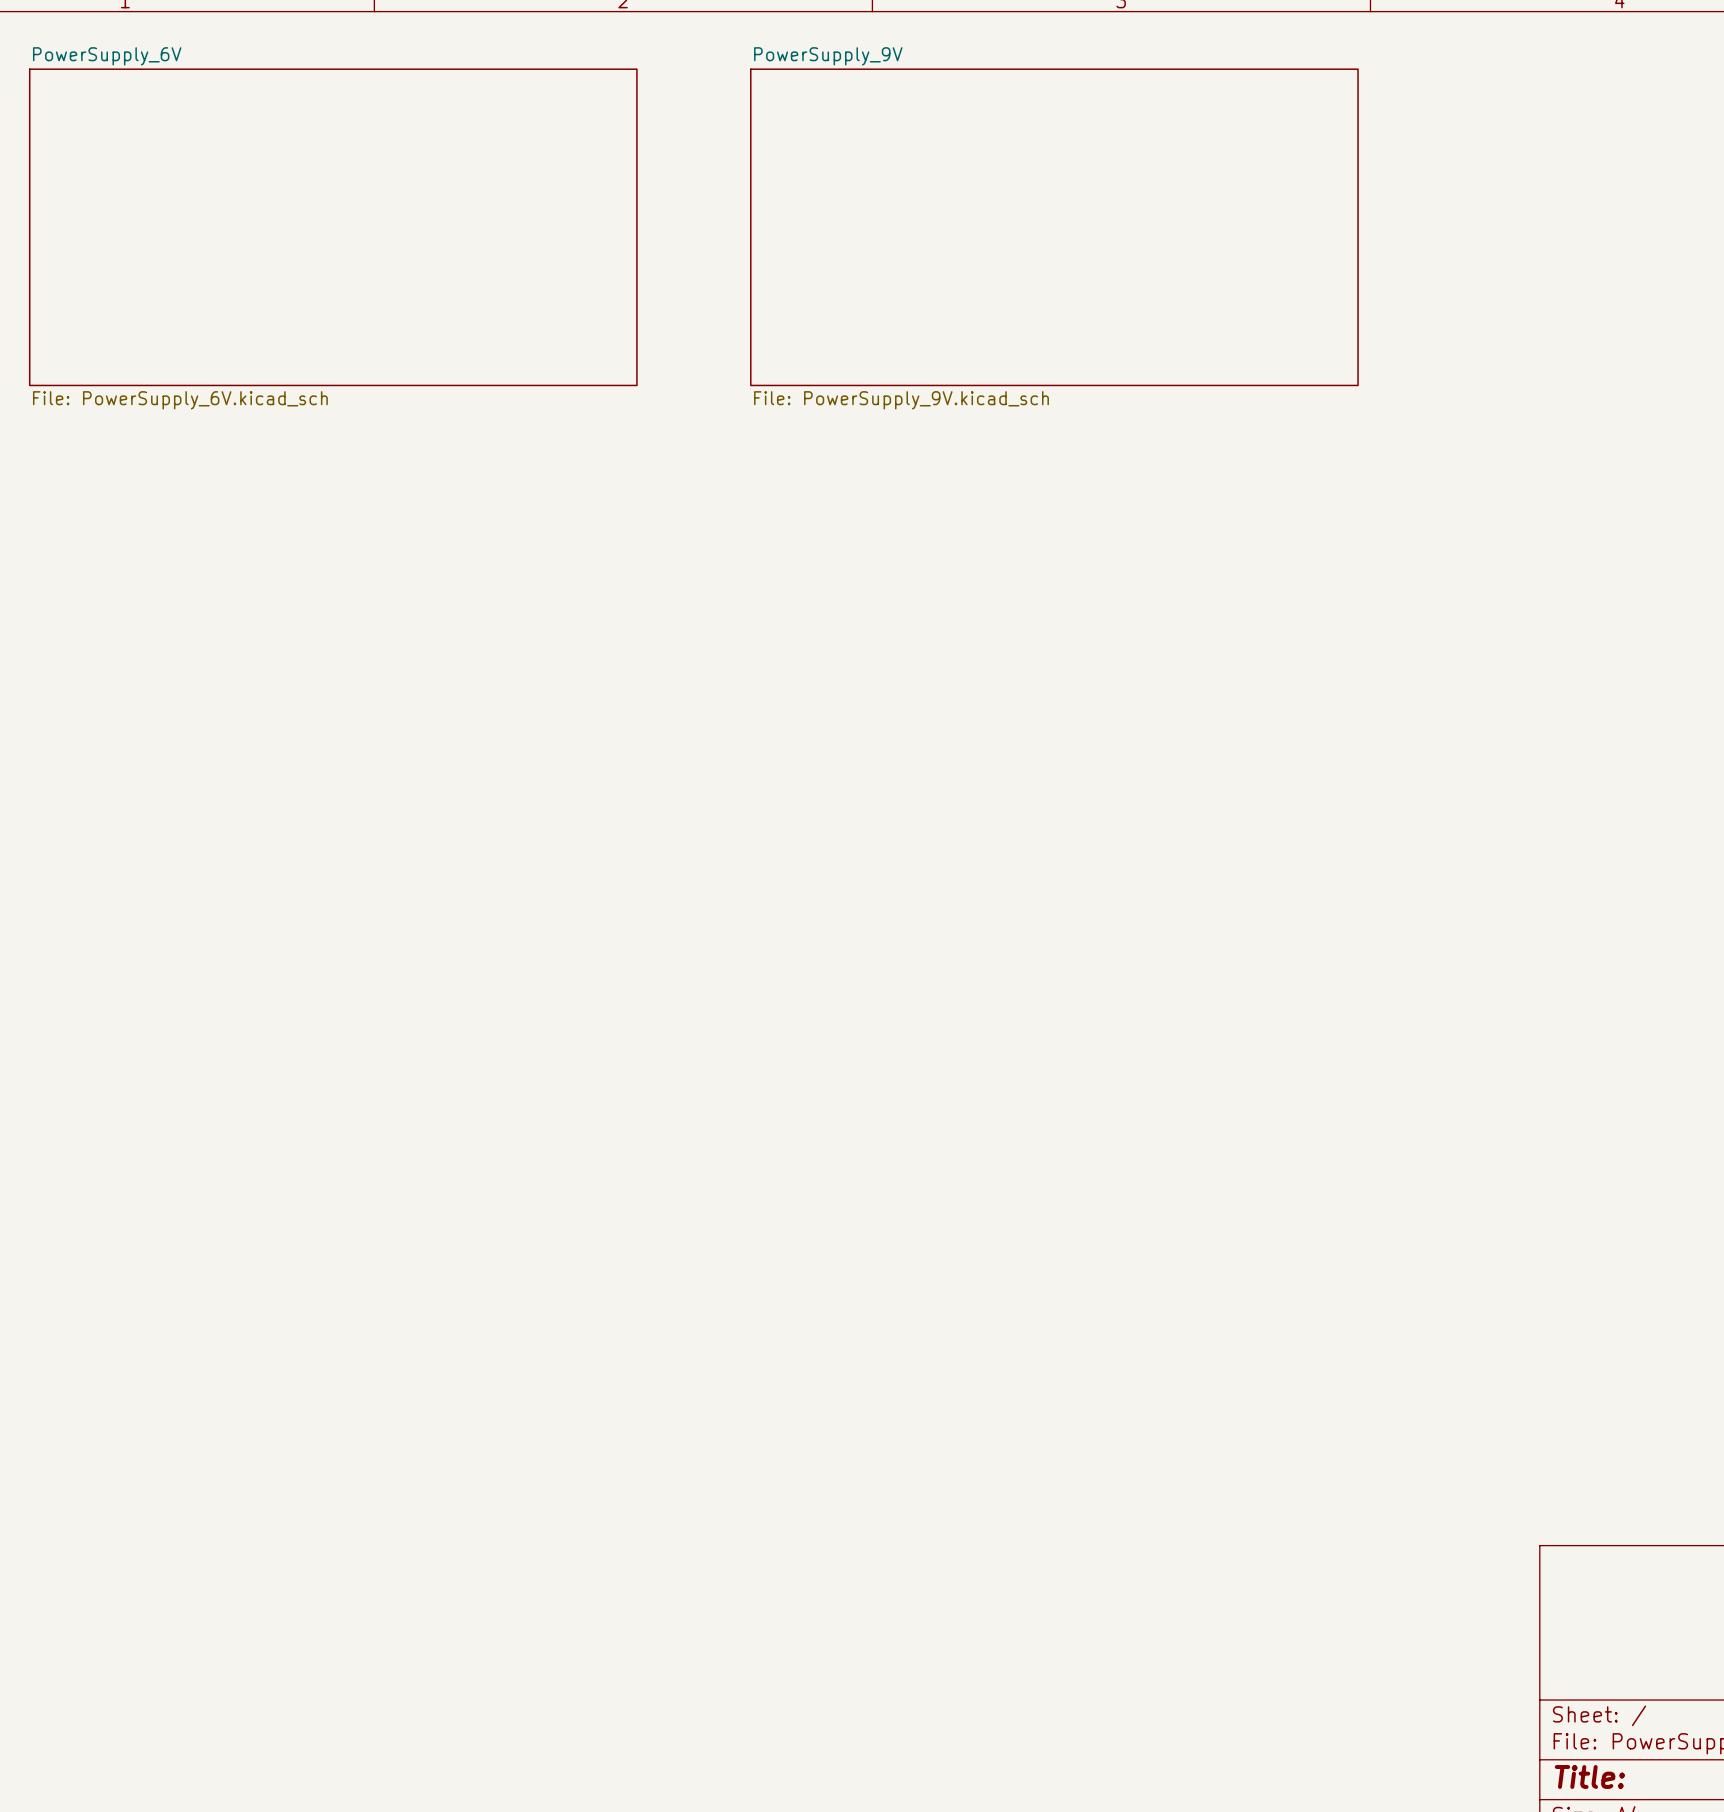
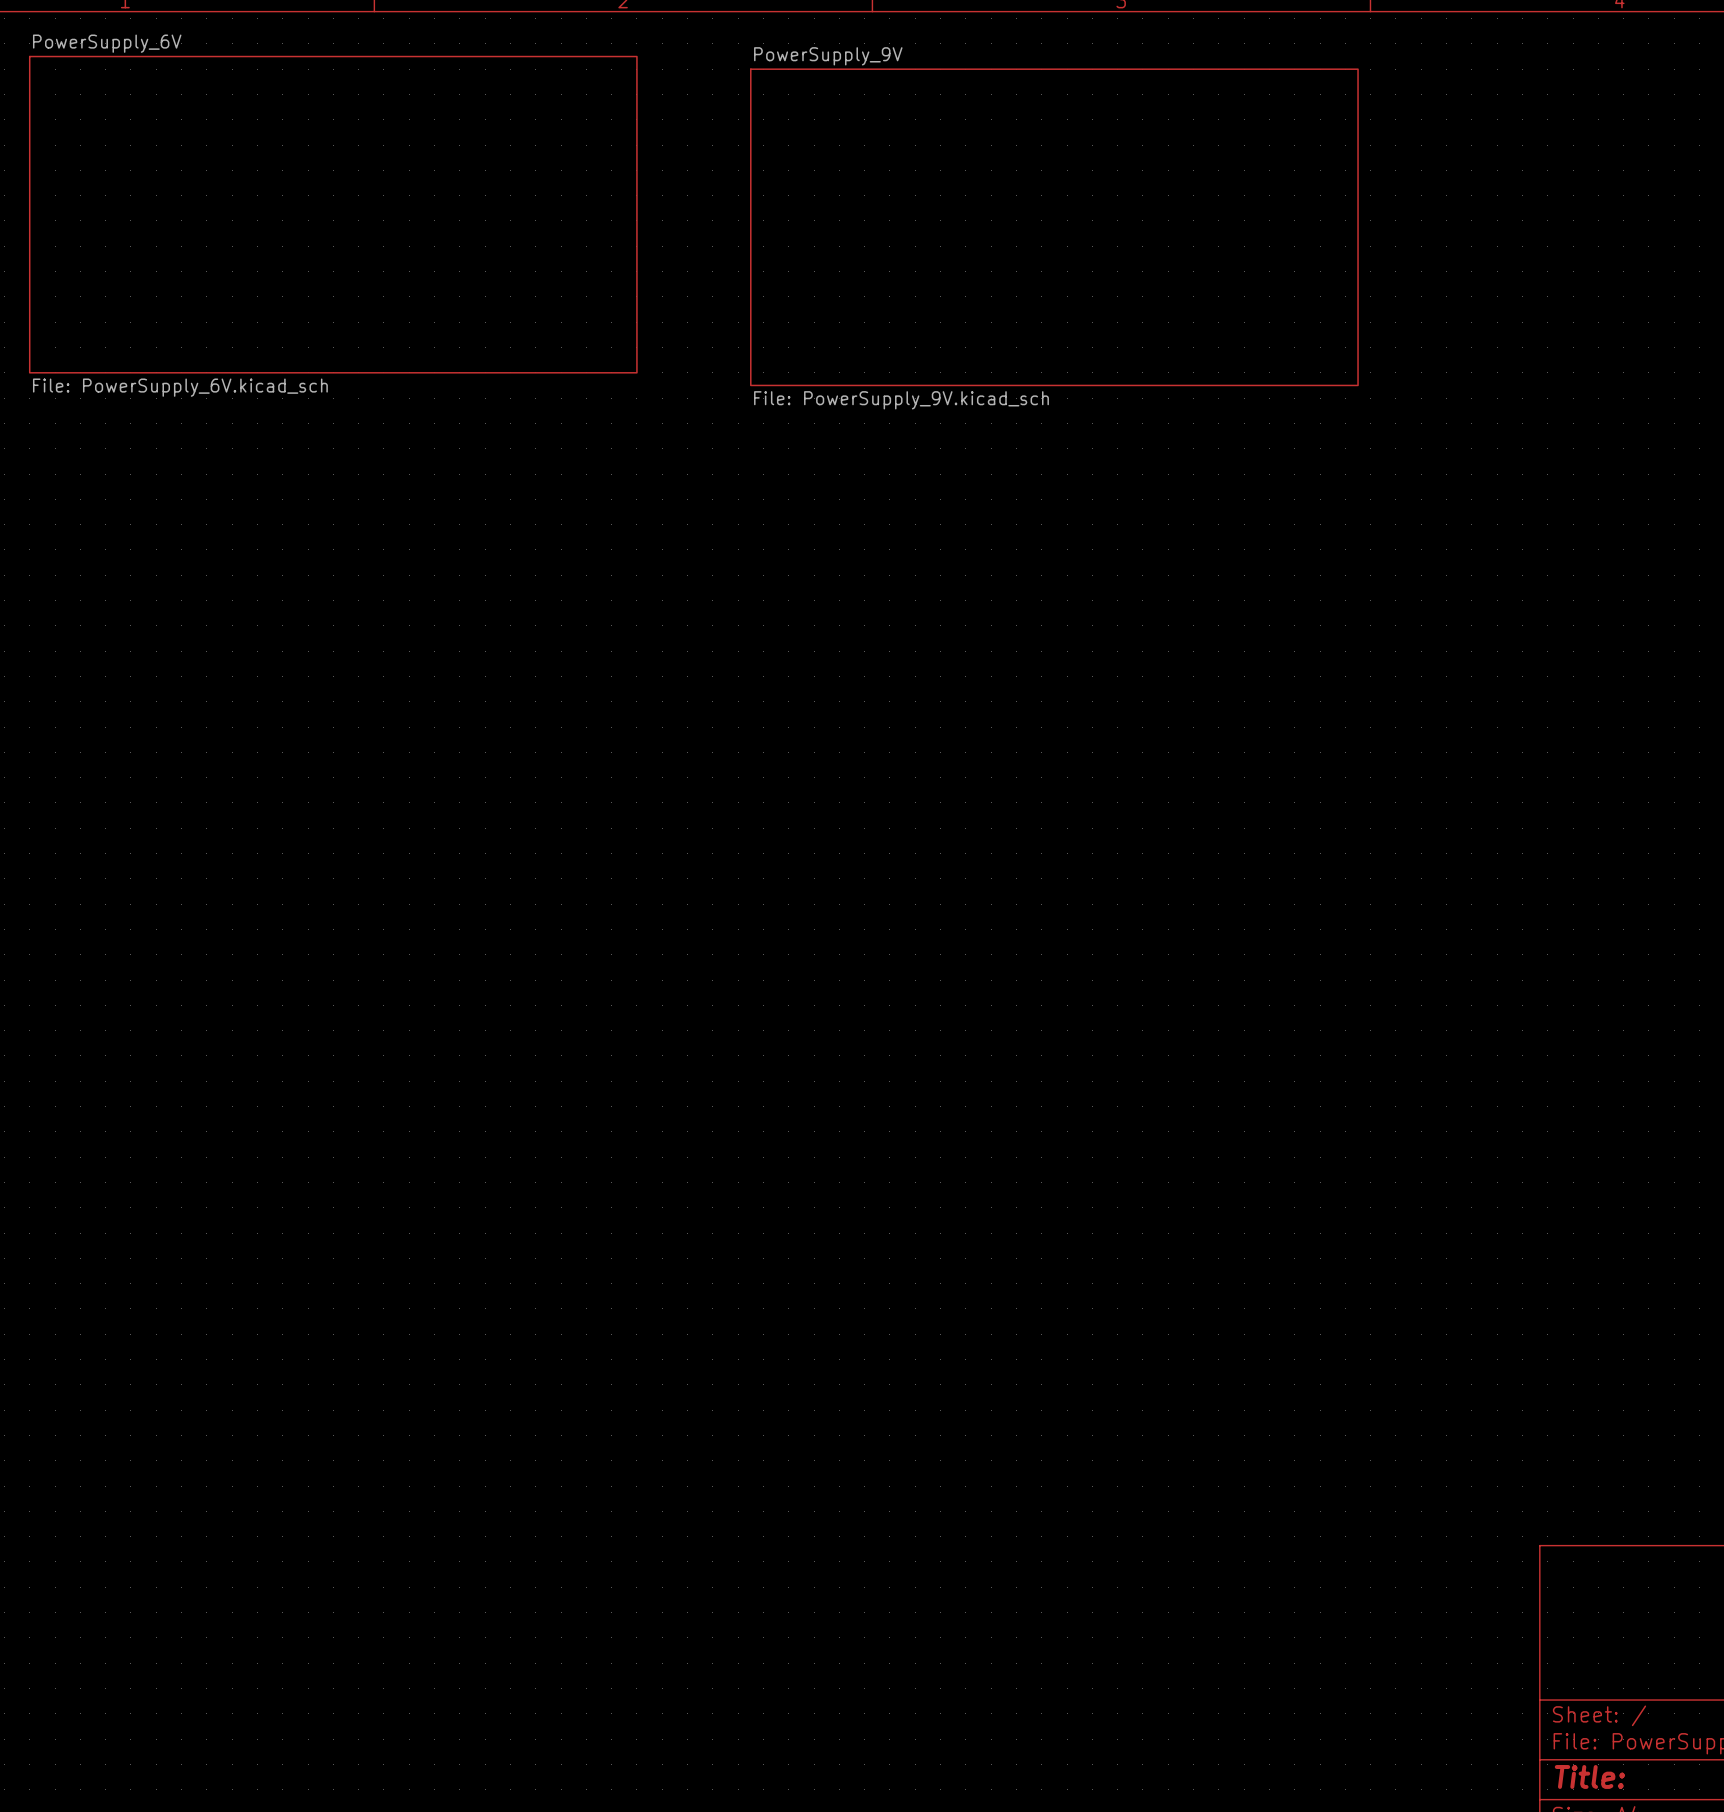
sheet PowerSupply_6V position: (333, 227) -> (333, 214)

